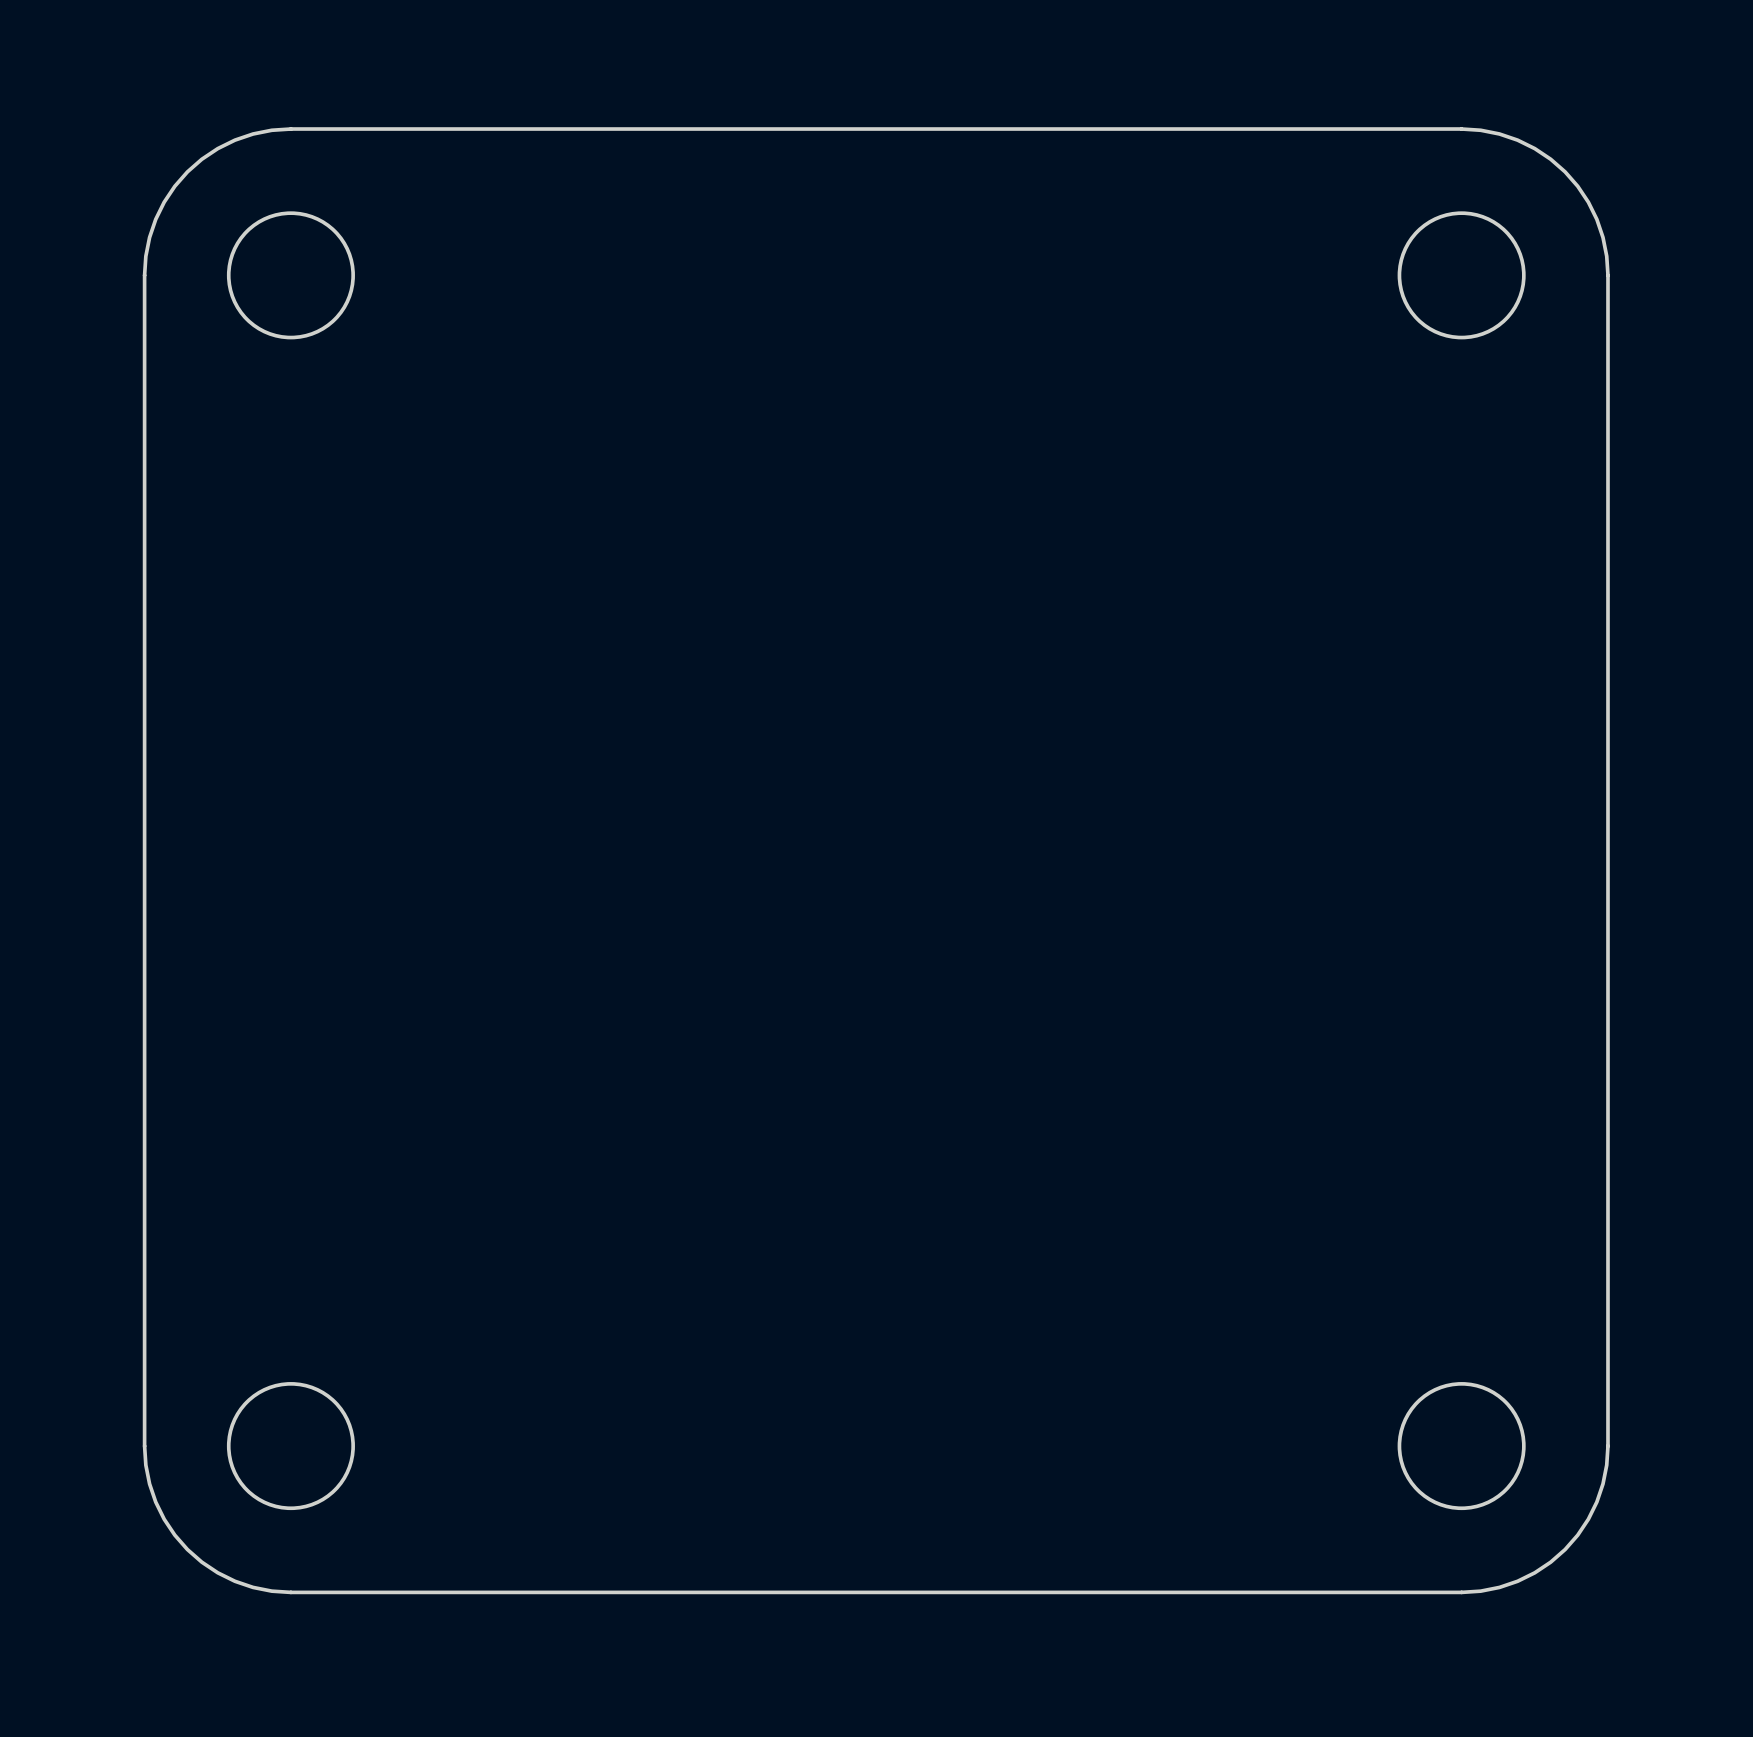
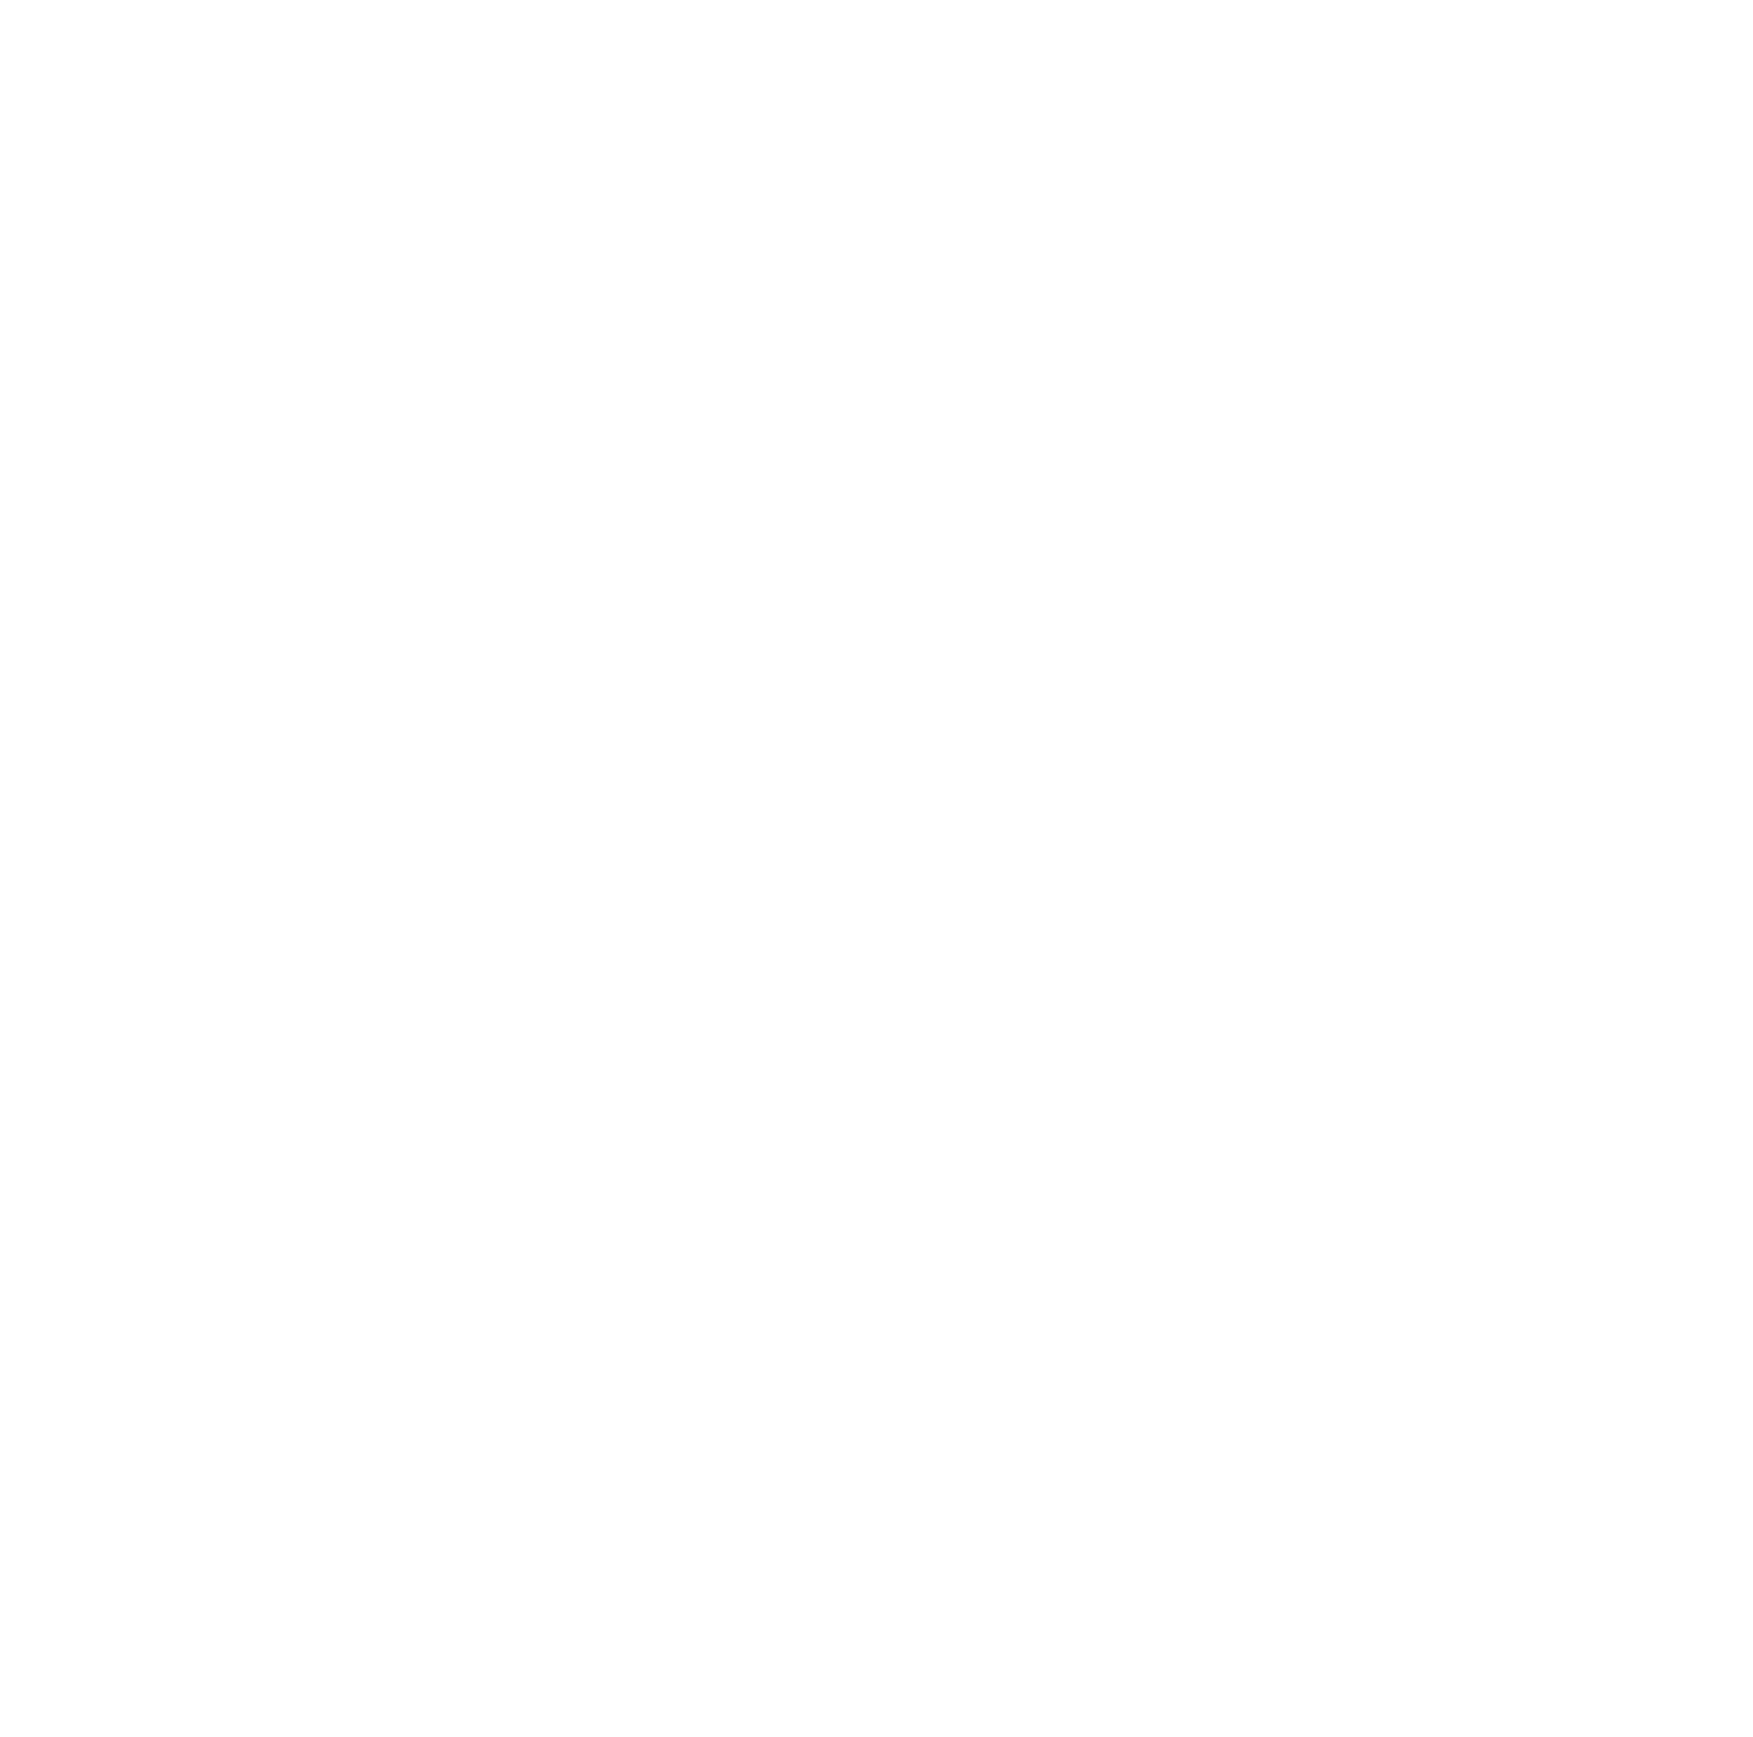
board edge: (1461, 129) (290, 129) (253, 134) (234, 140) (201, 159) (187, 171) (174, 186) (155, 219) (149, 237) (144, 275) (144, 1446) (145, 1465) (155, 1502) (174, 1535) (187, 1549) (201, 1562) (234, 1581) (253, 1587) (290, 1592) (1461, 1592) (1480, 1591) (1517, 1581) (1550, 1562) (1565, 1549) (1588, 1519) (1596, 1502) (1606, 1465) (1607, 1446) (1606, 256) (1596, 219) (1588, 202) (1565, 171) (1550, 159) (1517, 140) (1499, 134) (1461, 129) -> none
round board edge: [226, 211, 355, 340] -> none
round board edge: [1397, 211, 1526, 340] -> none
round board edge: [226, 1382, 355, 1511] -> none
round board edge: [1397, 1382, 1526, 1511] -> none

